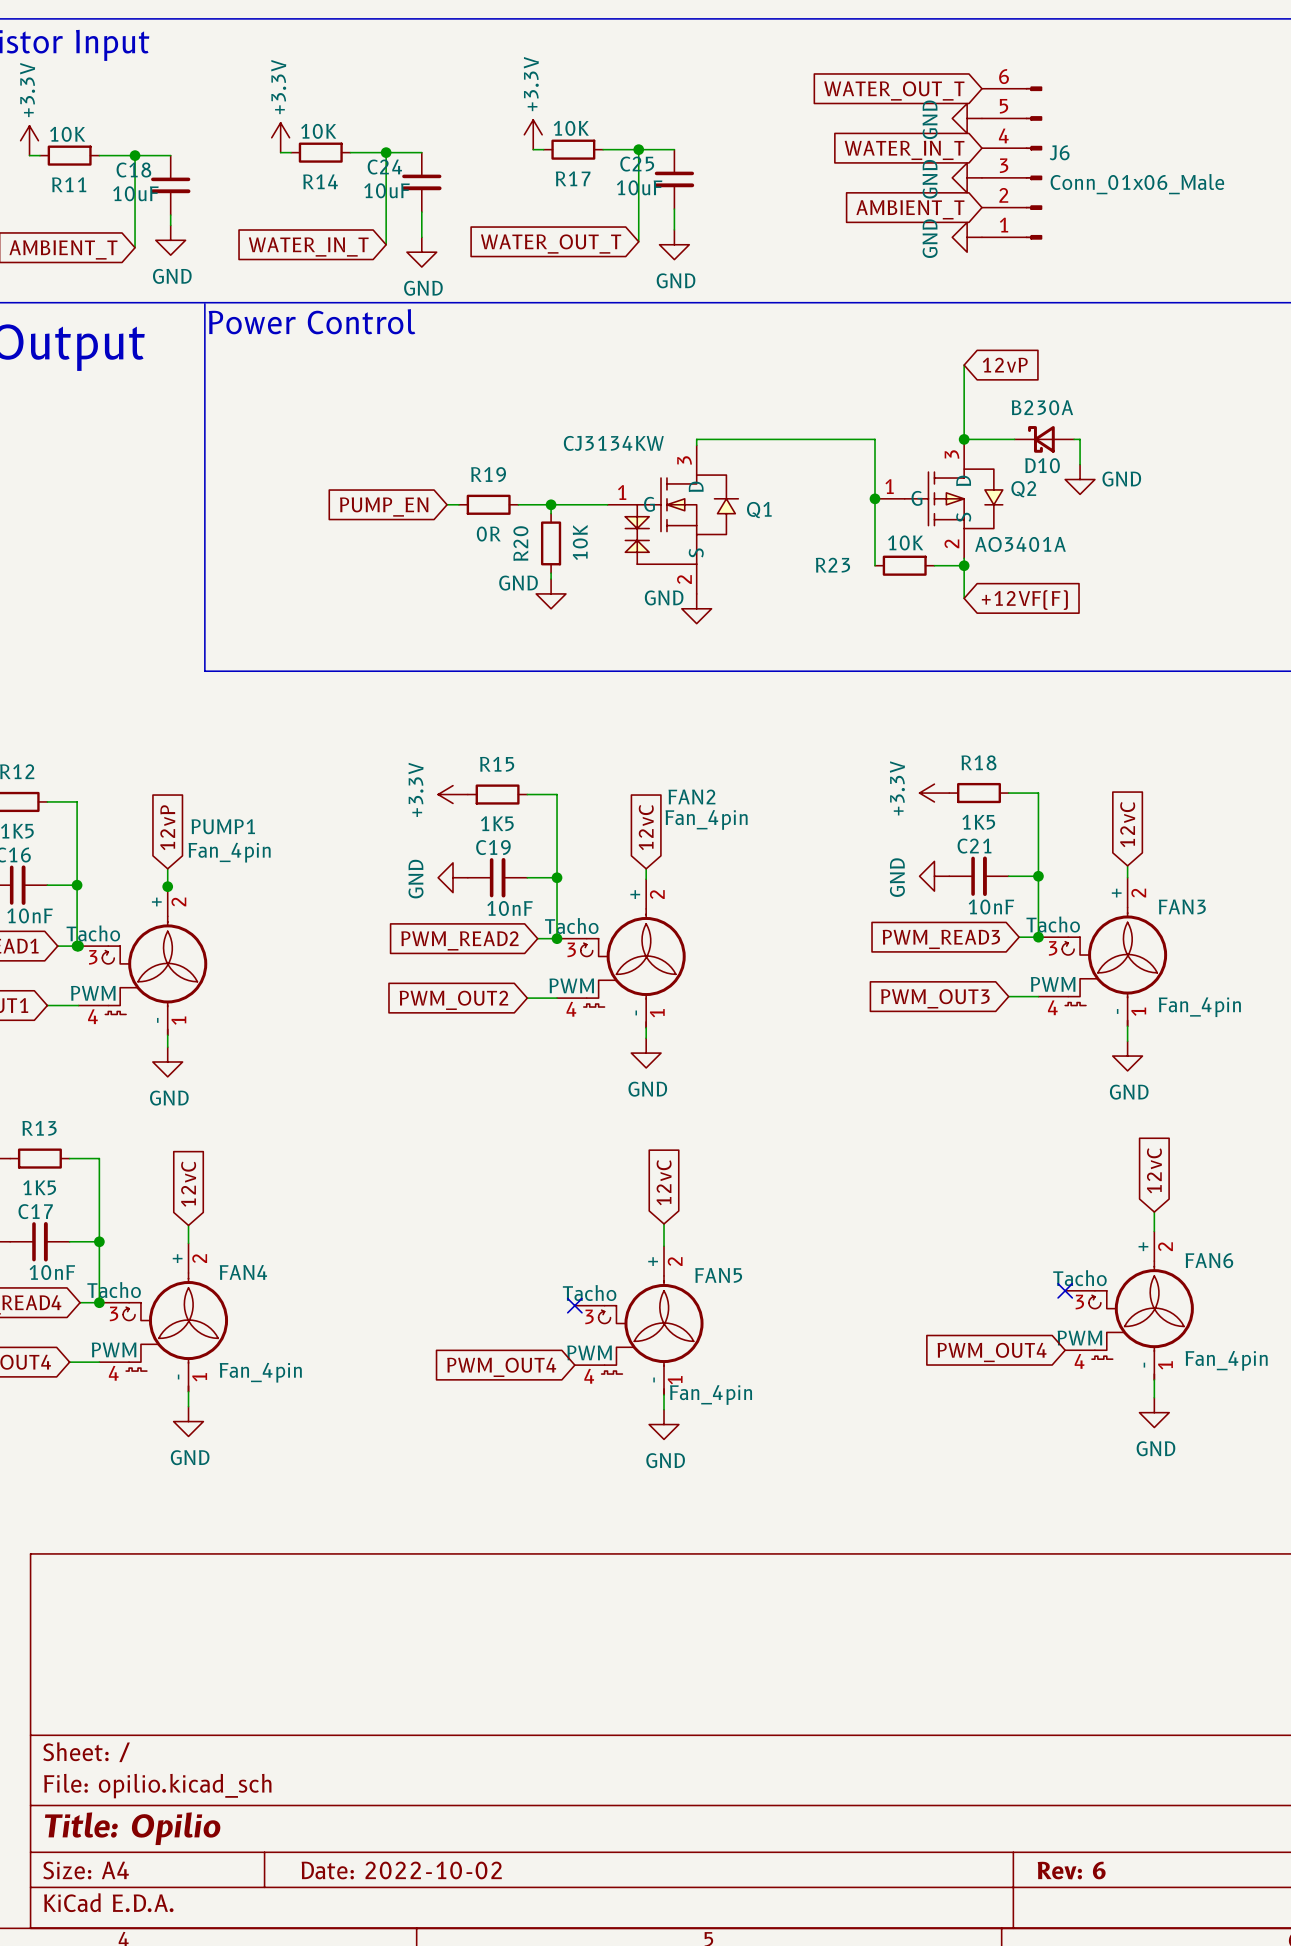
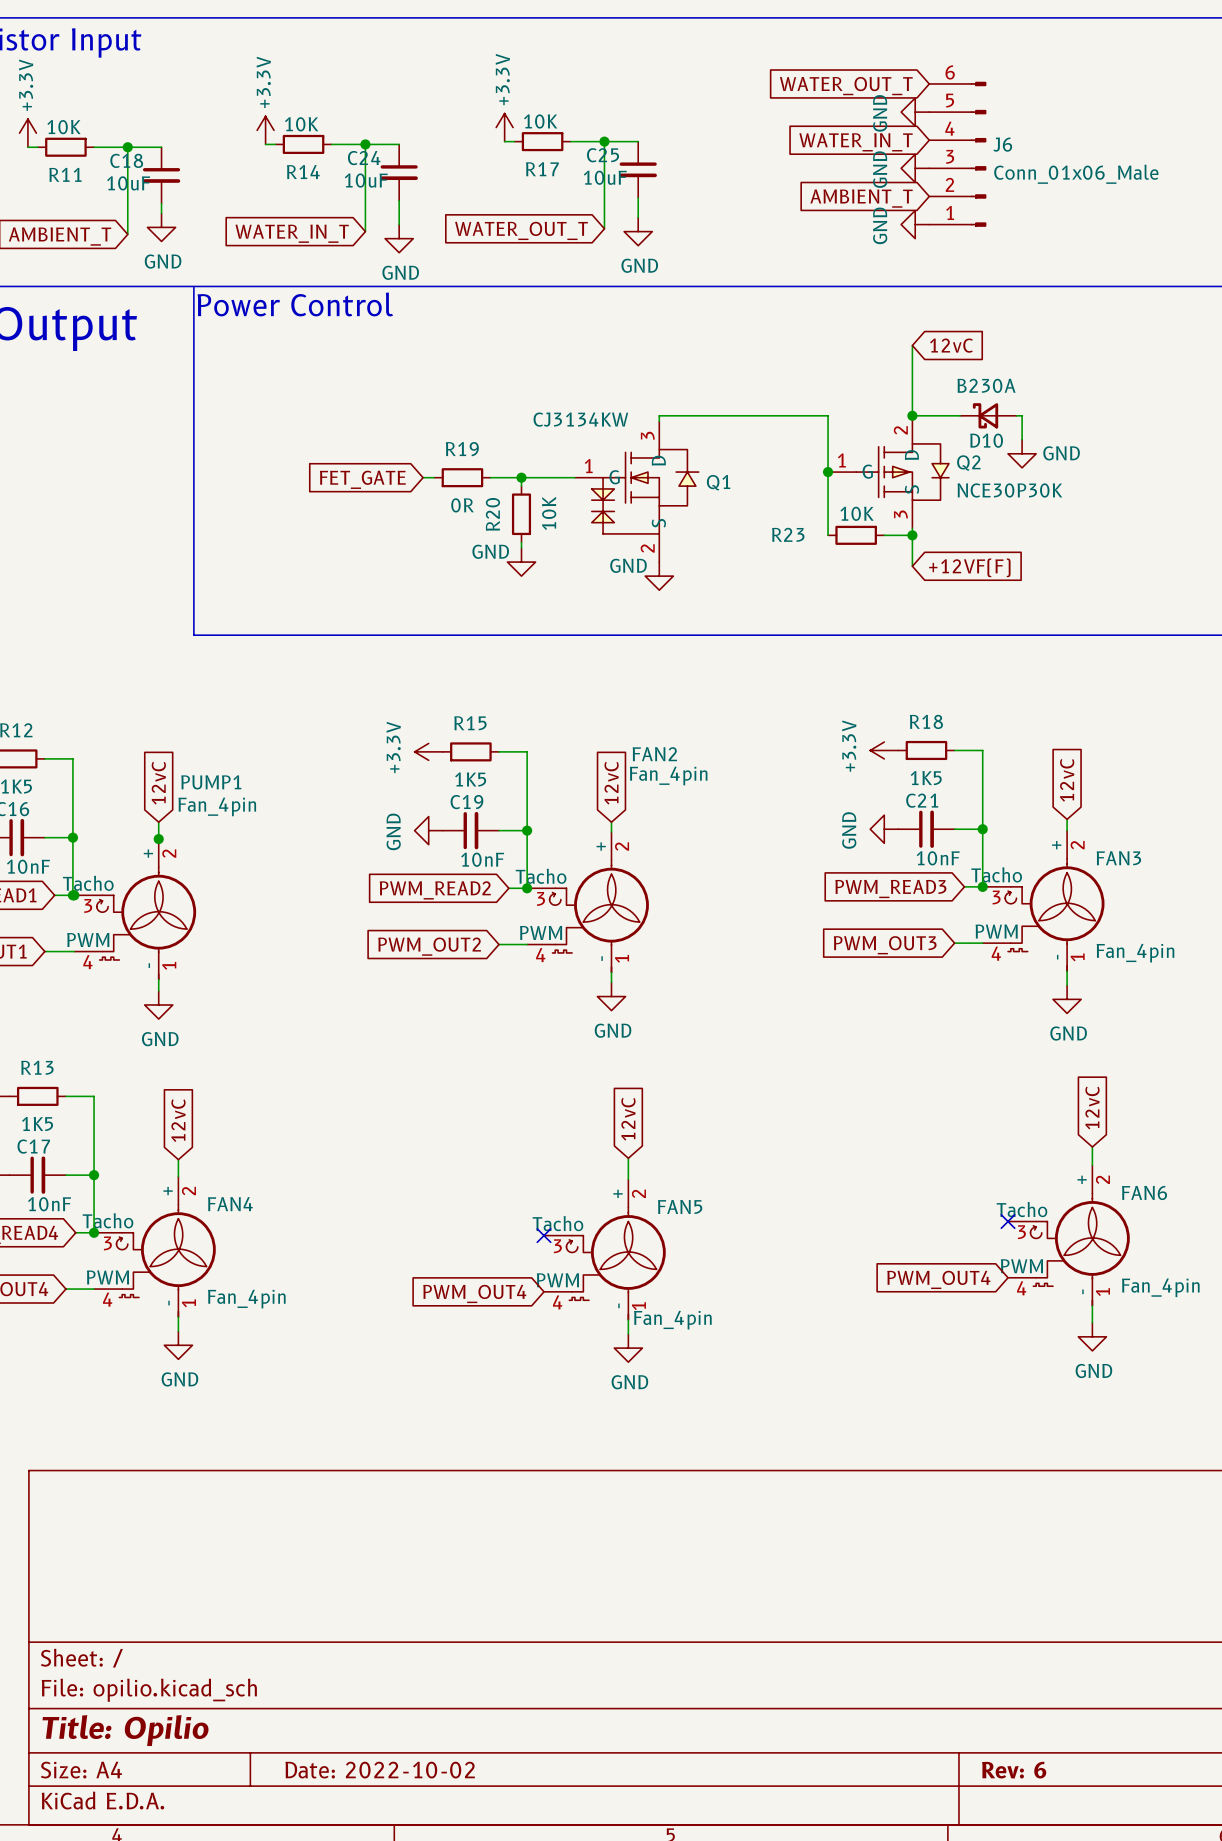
global label: 12vP (1005, 365) -> 12vC (951, 345)
Q2 symbol: [875, 439, 1003, 559] -> [828, 415, 949, 529]
global label: PUMP_EN (384, 507) -> FET_GATE (362, 479)
Q2 value: AO3401A (1020, 544) -> NCE30P30K (1009, 490)
global label: 12vP (167, 827) -> 12vC (158, 783)

